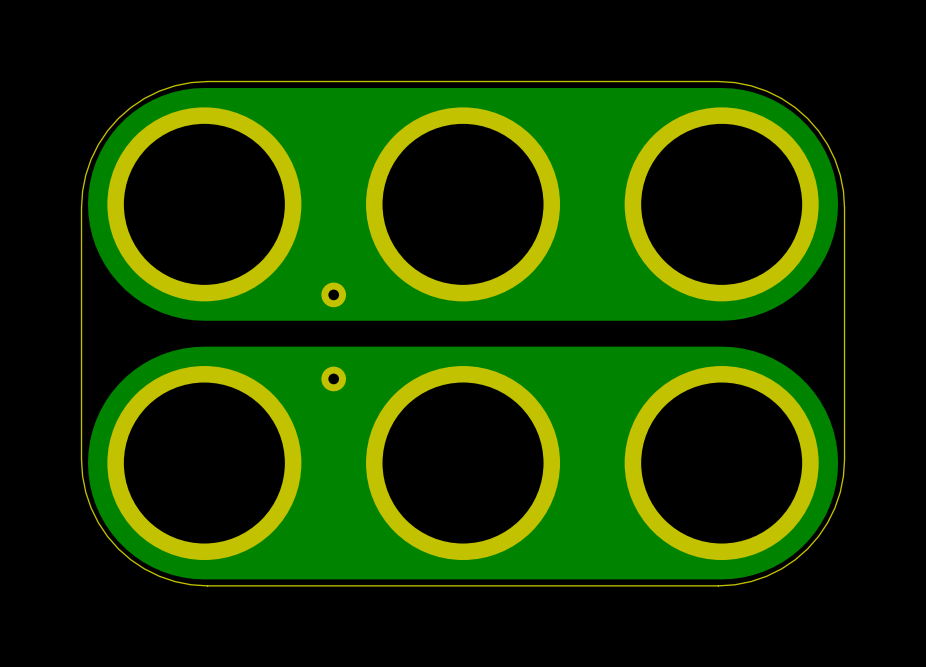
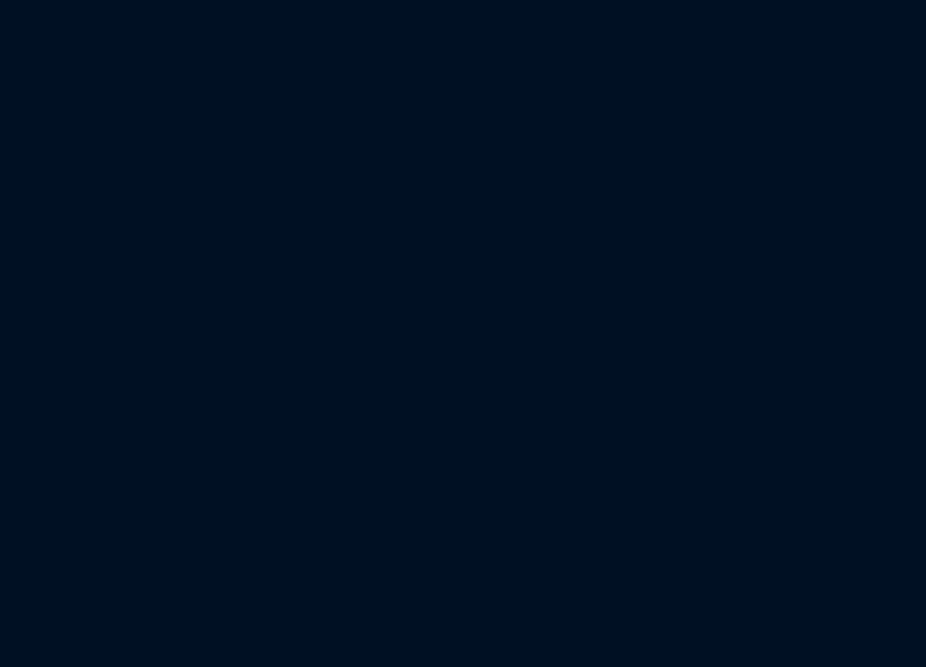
part: (463, 333) -> none

